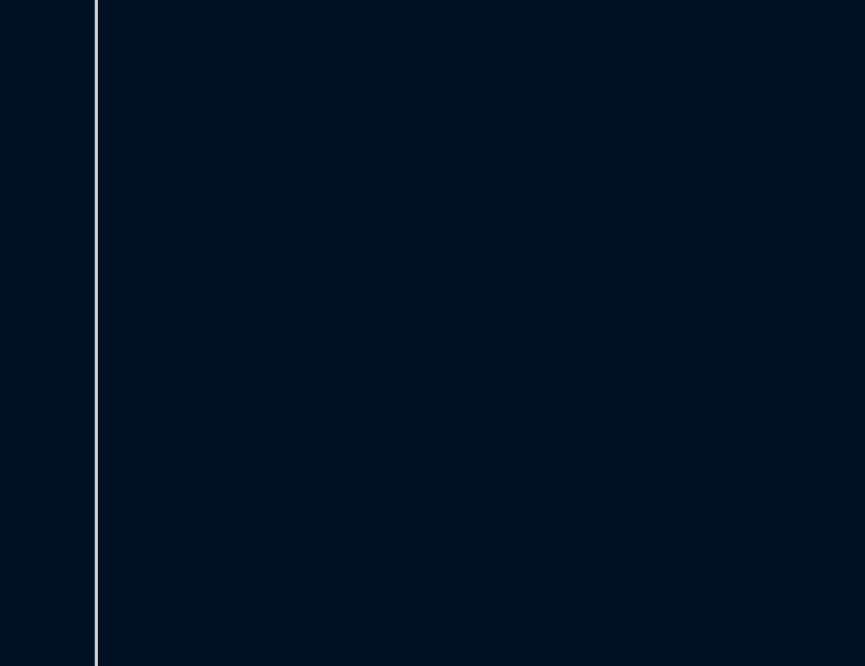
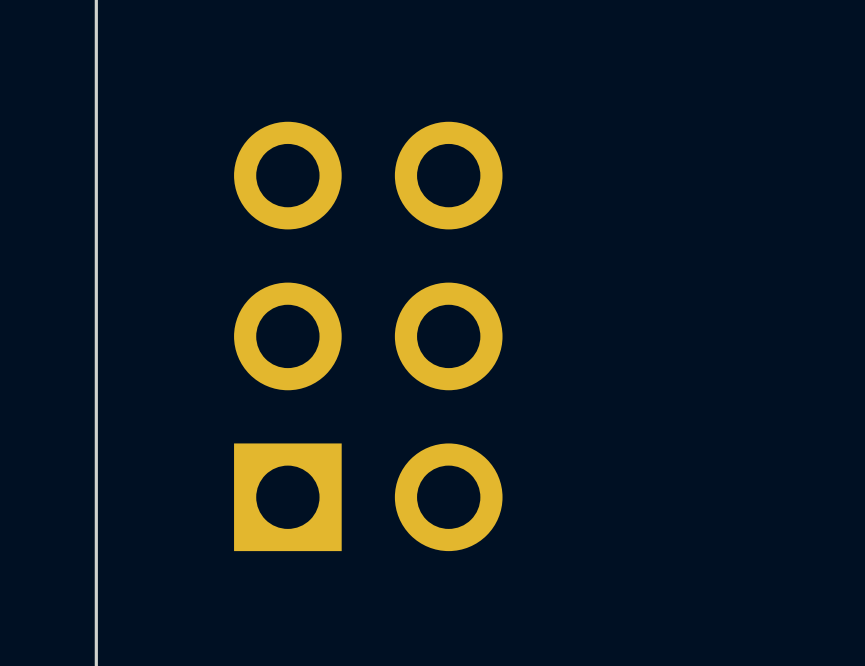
part: none -> (368, 336)

